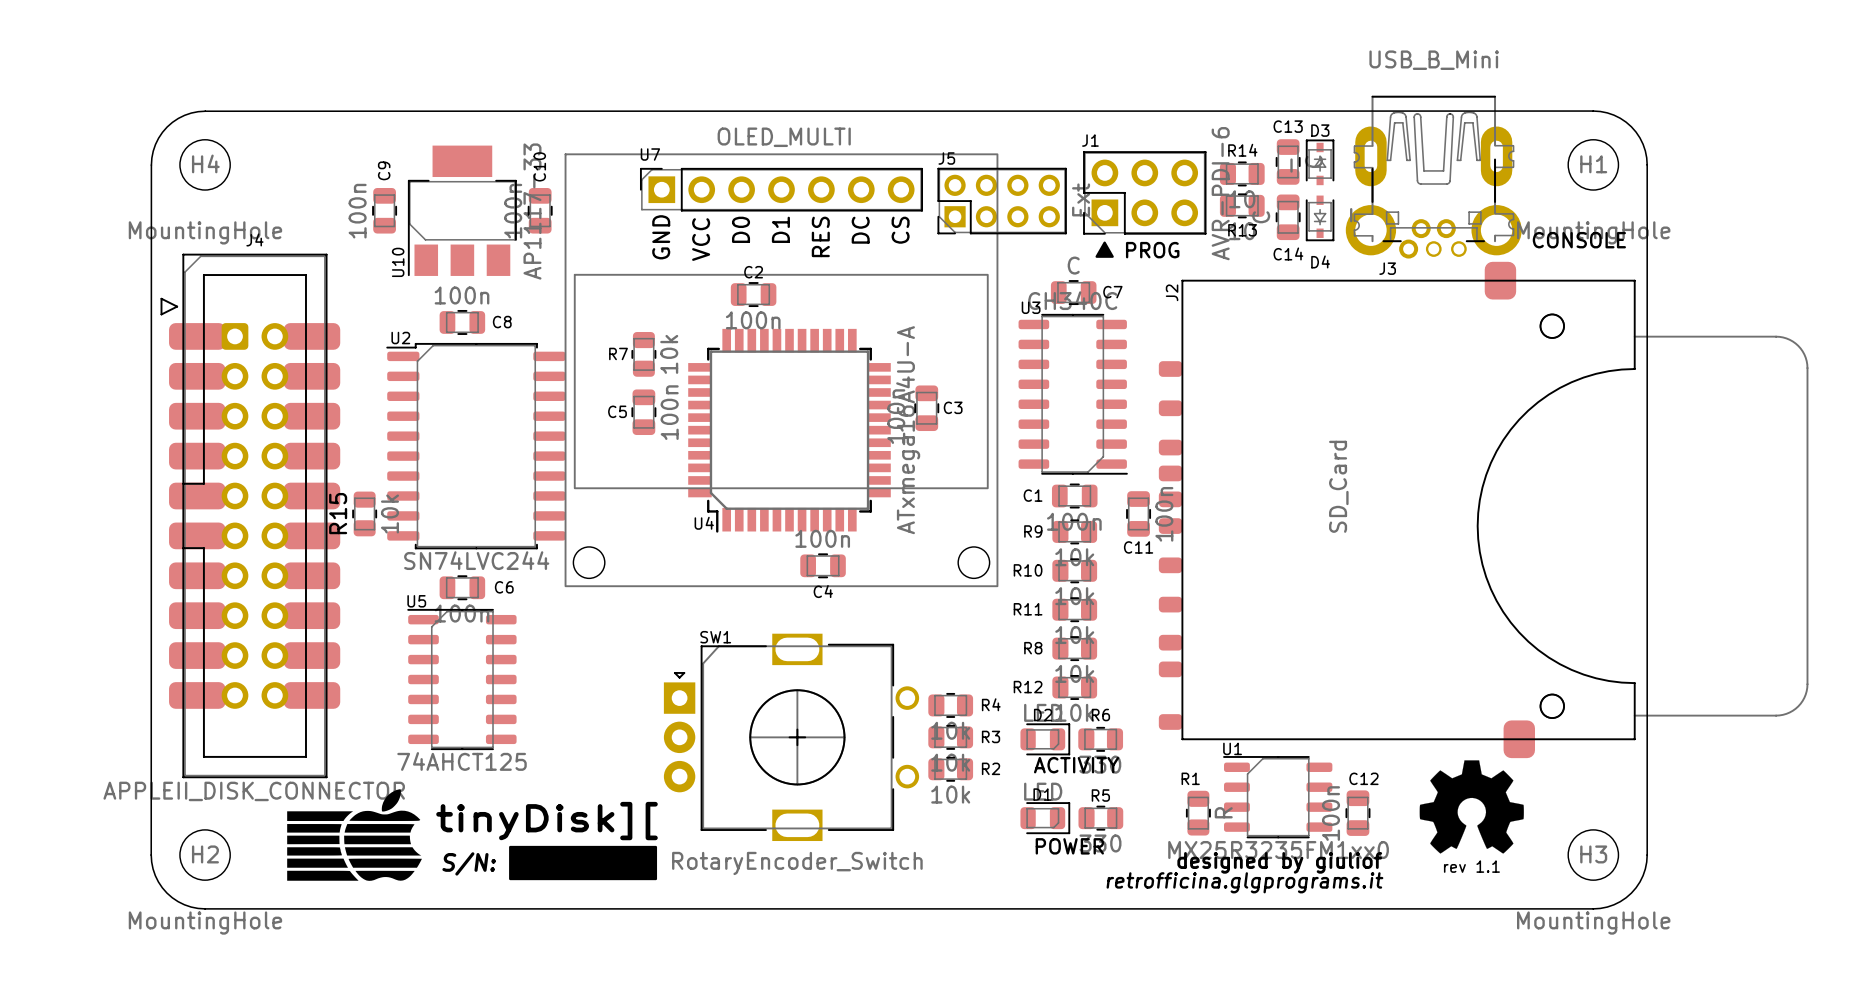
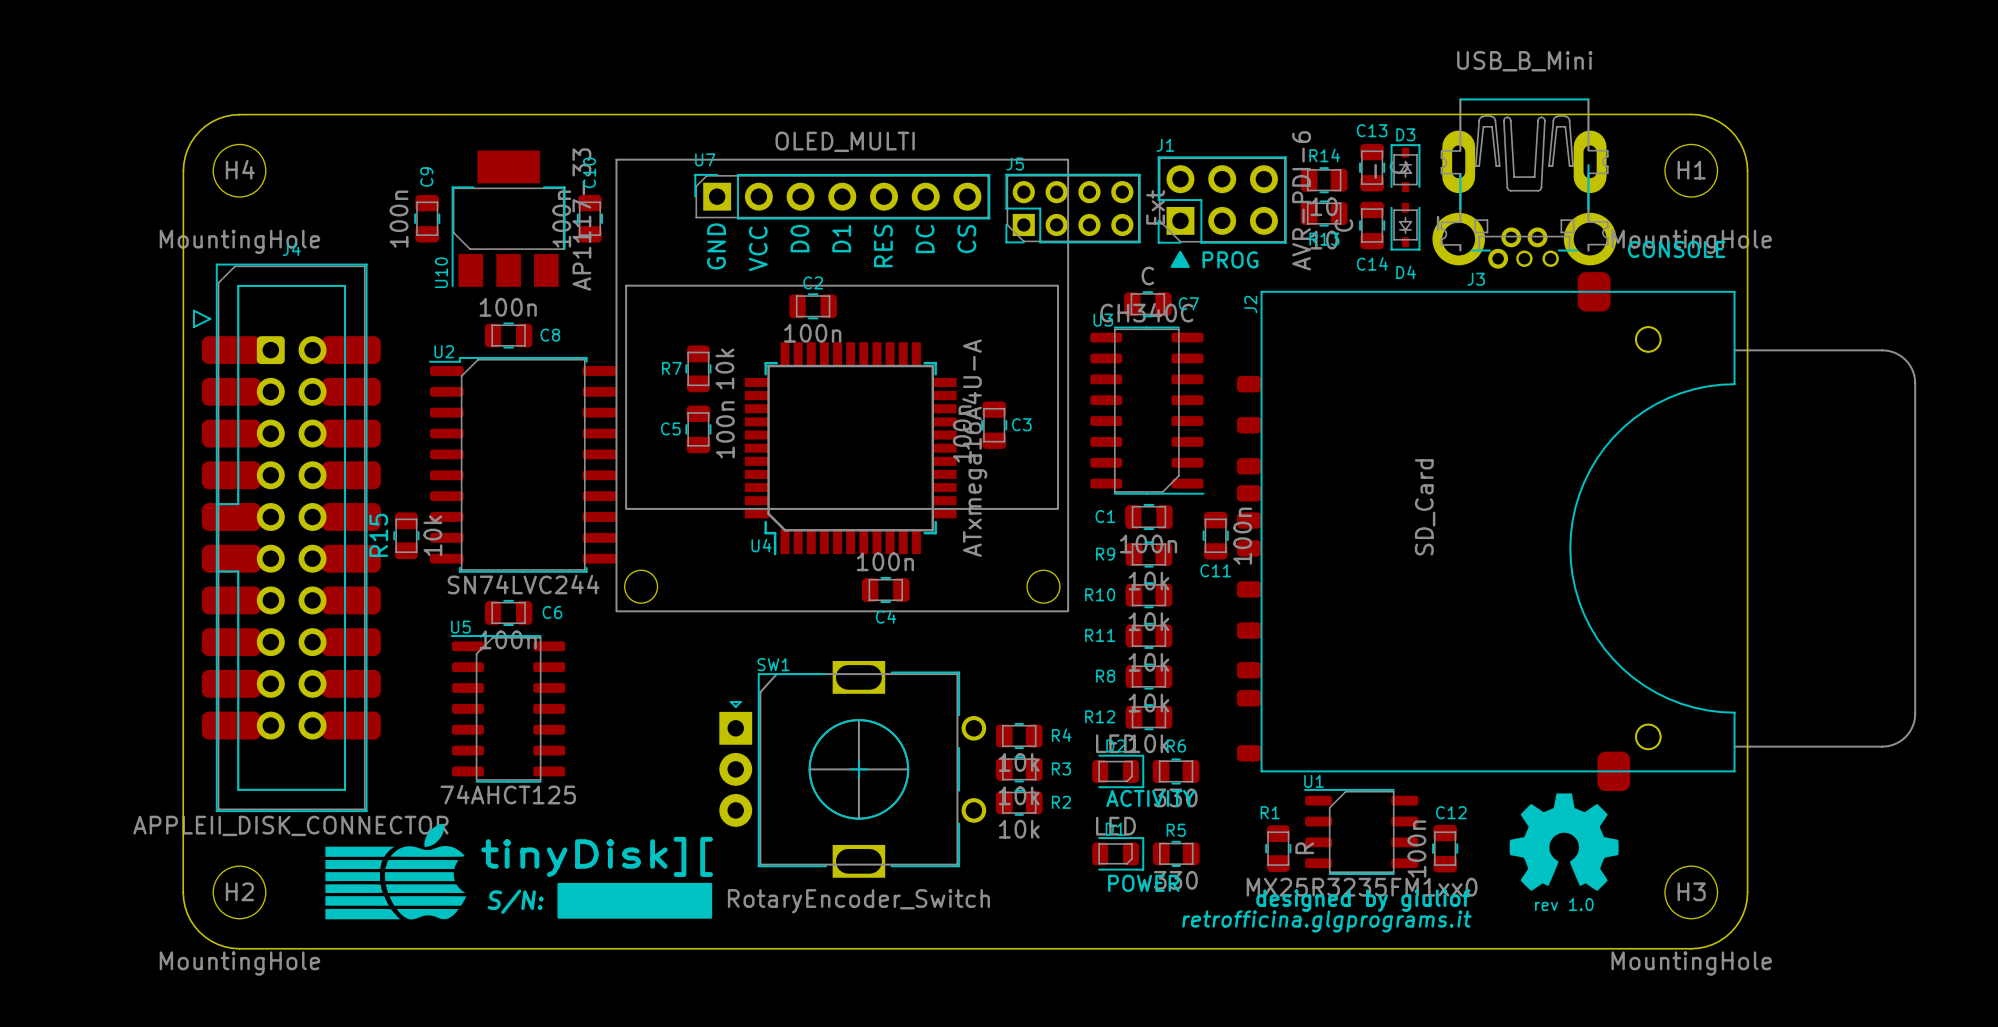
text: rev 1.1 (1471, 866) -> rev 1.0 (1564, 904)

